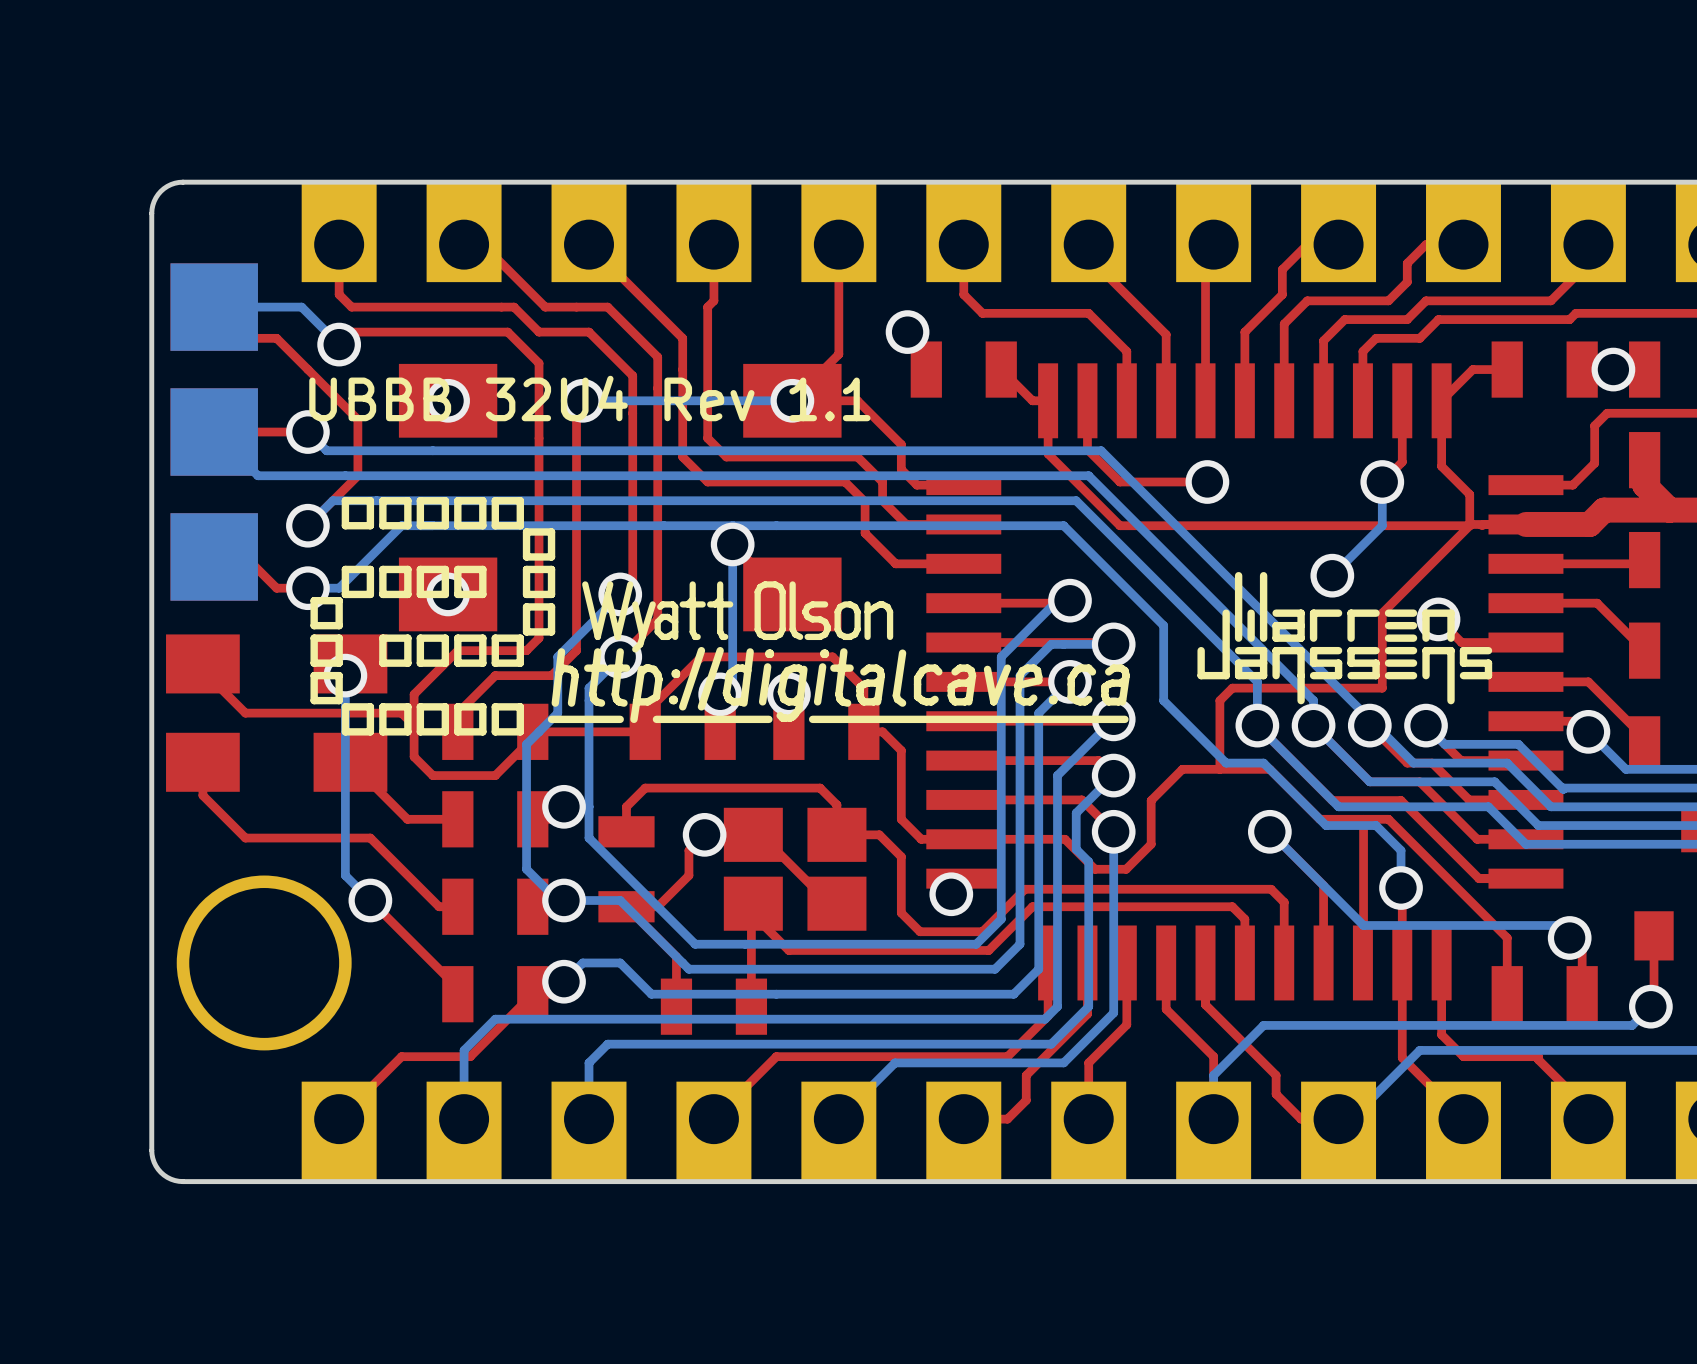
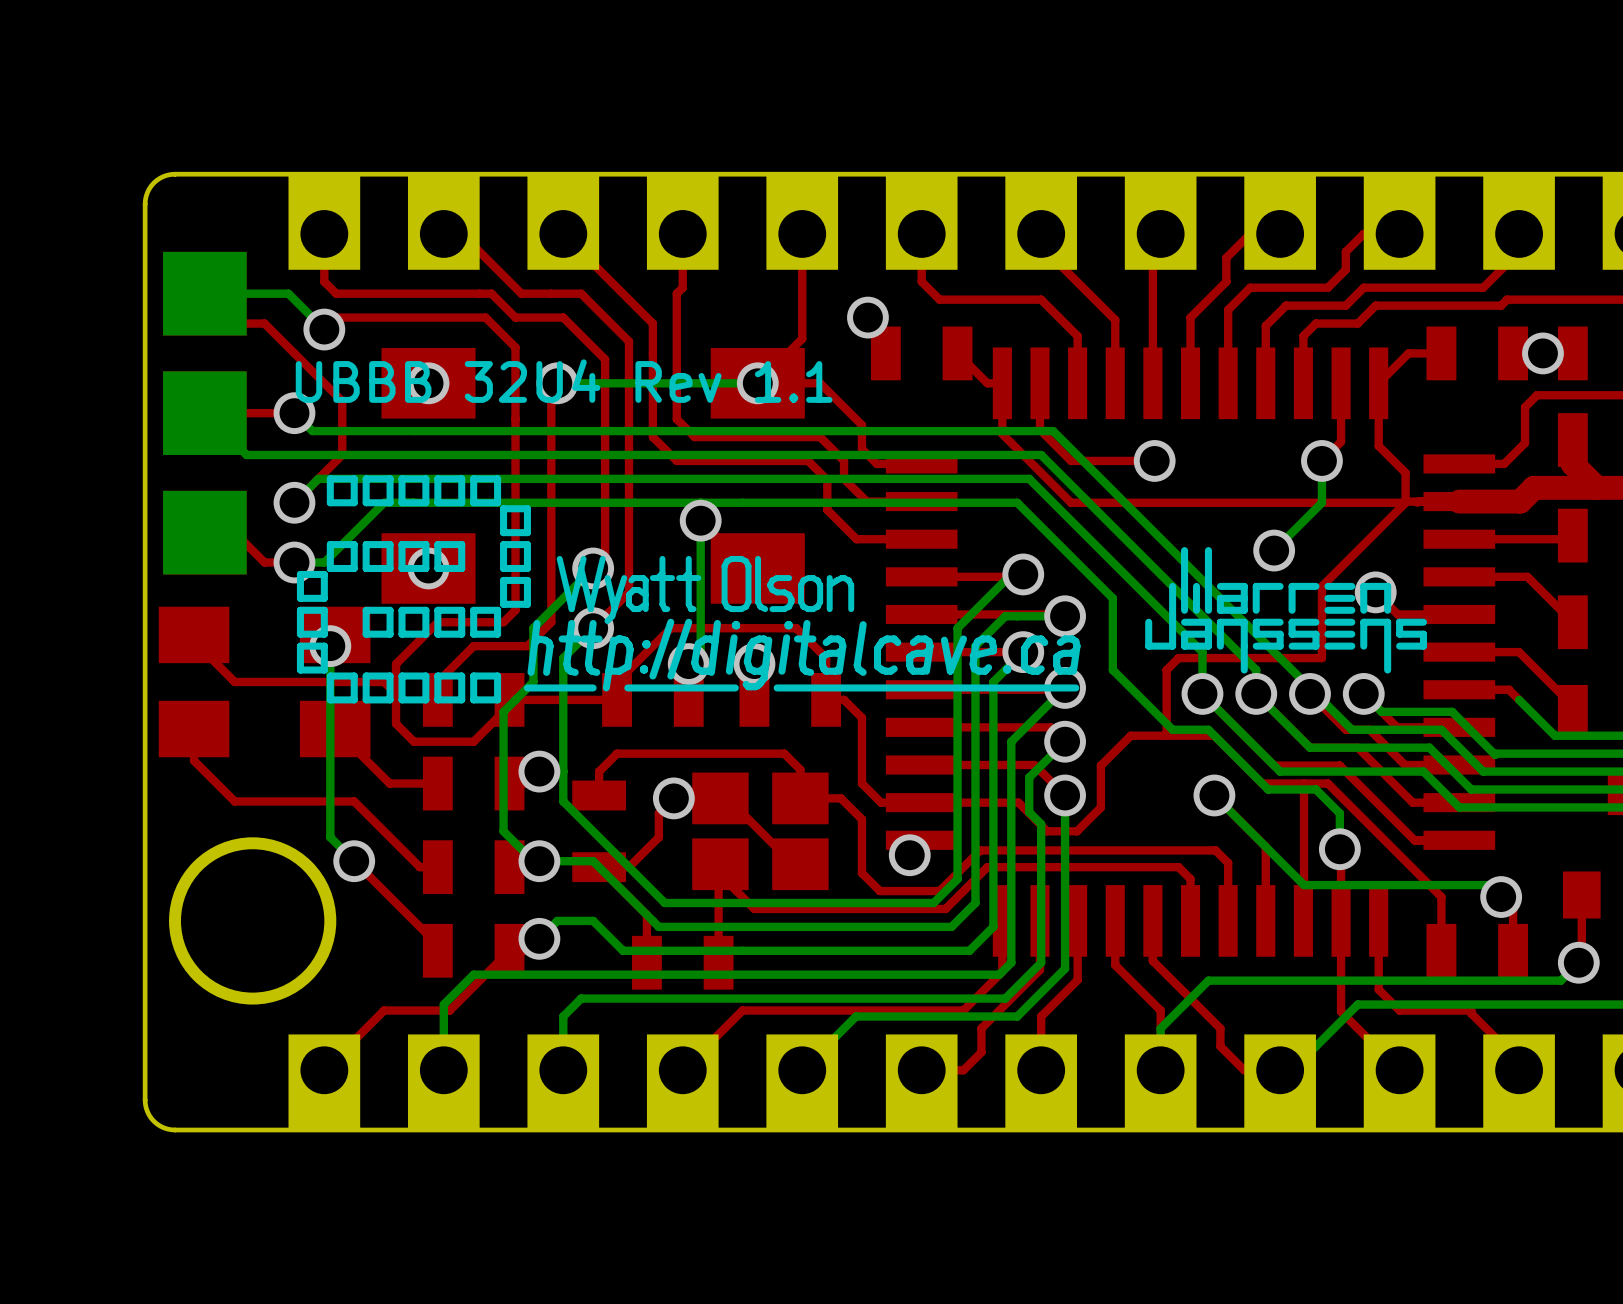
via: (1588, 731) -> none

